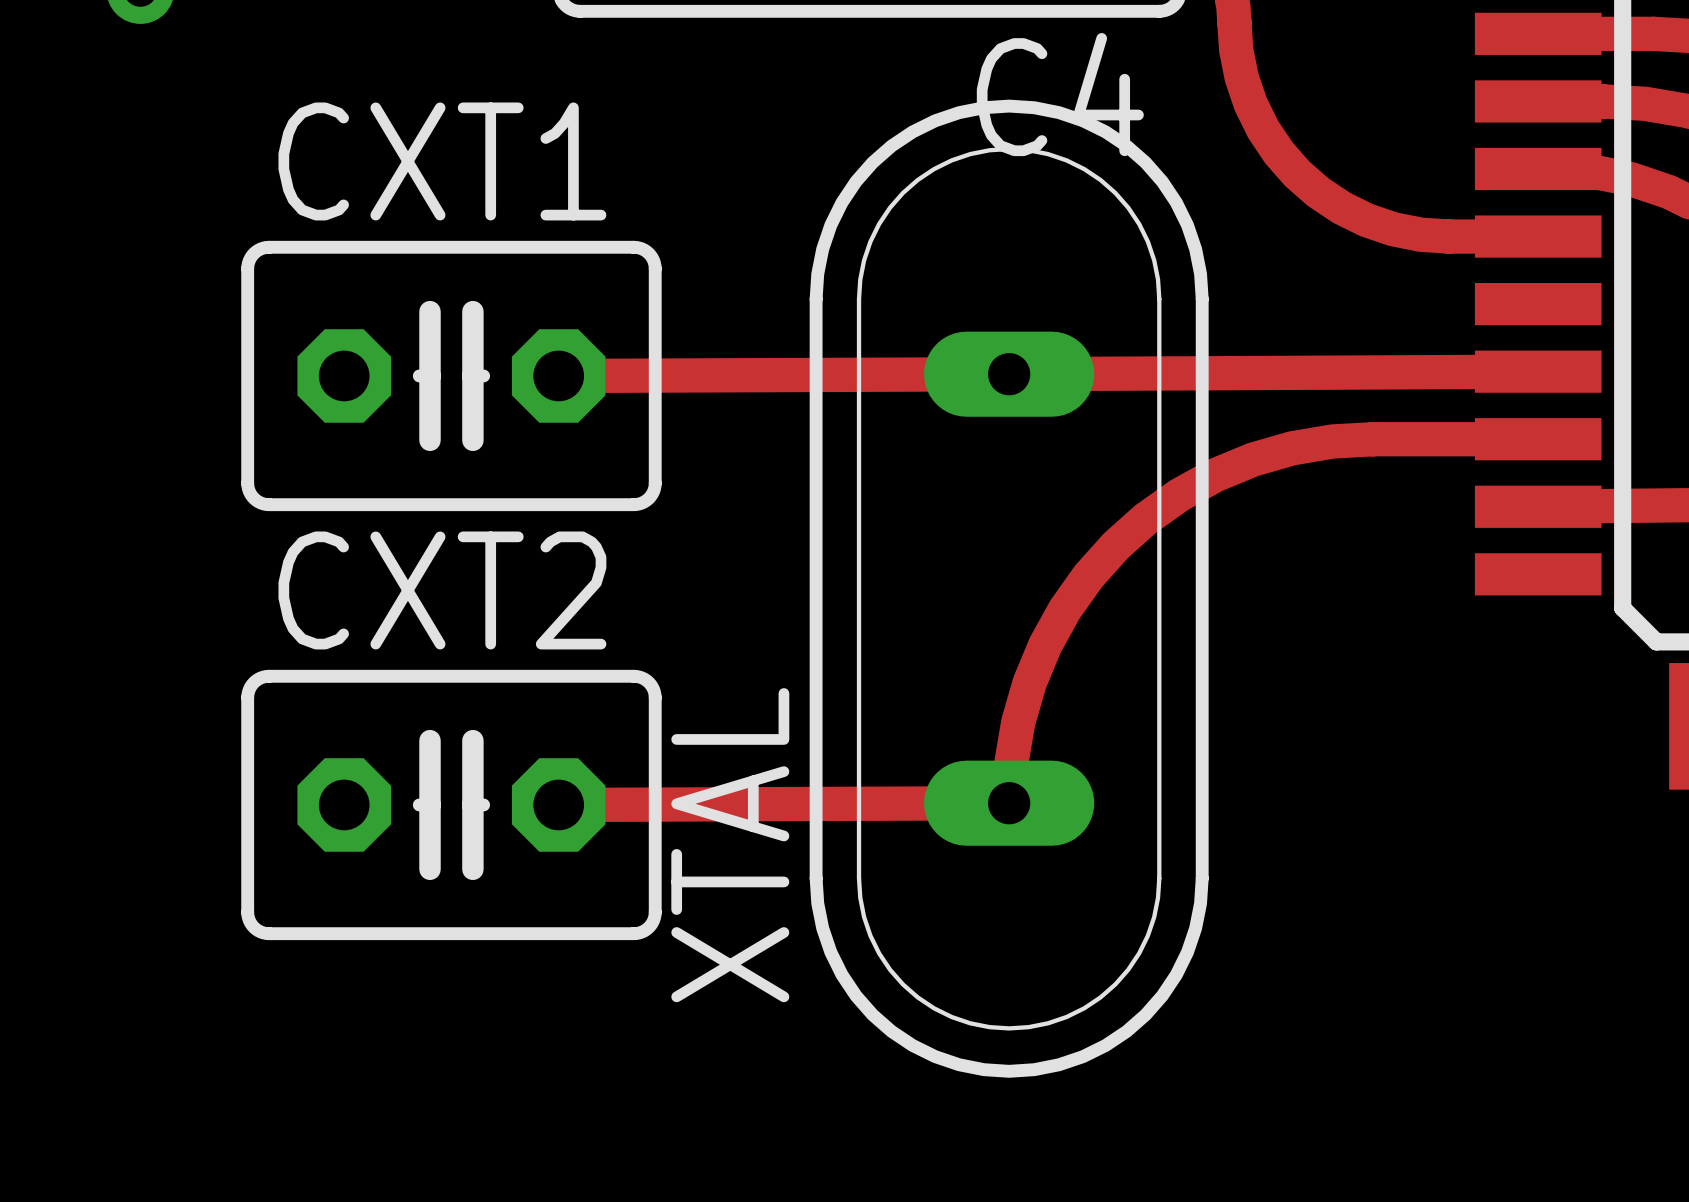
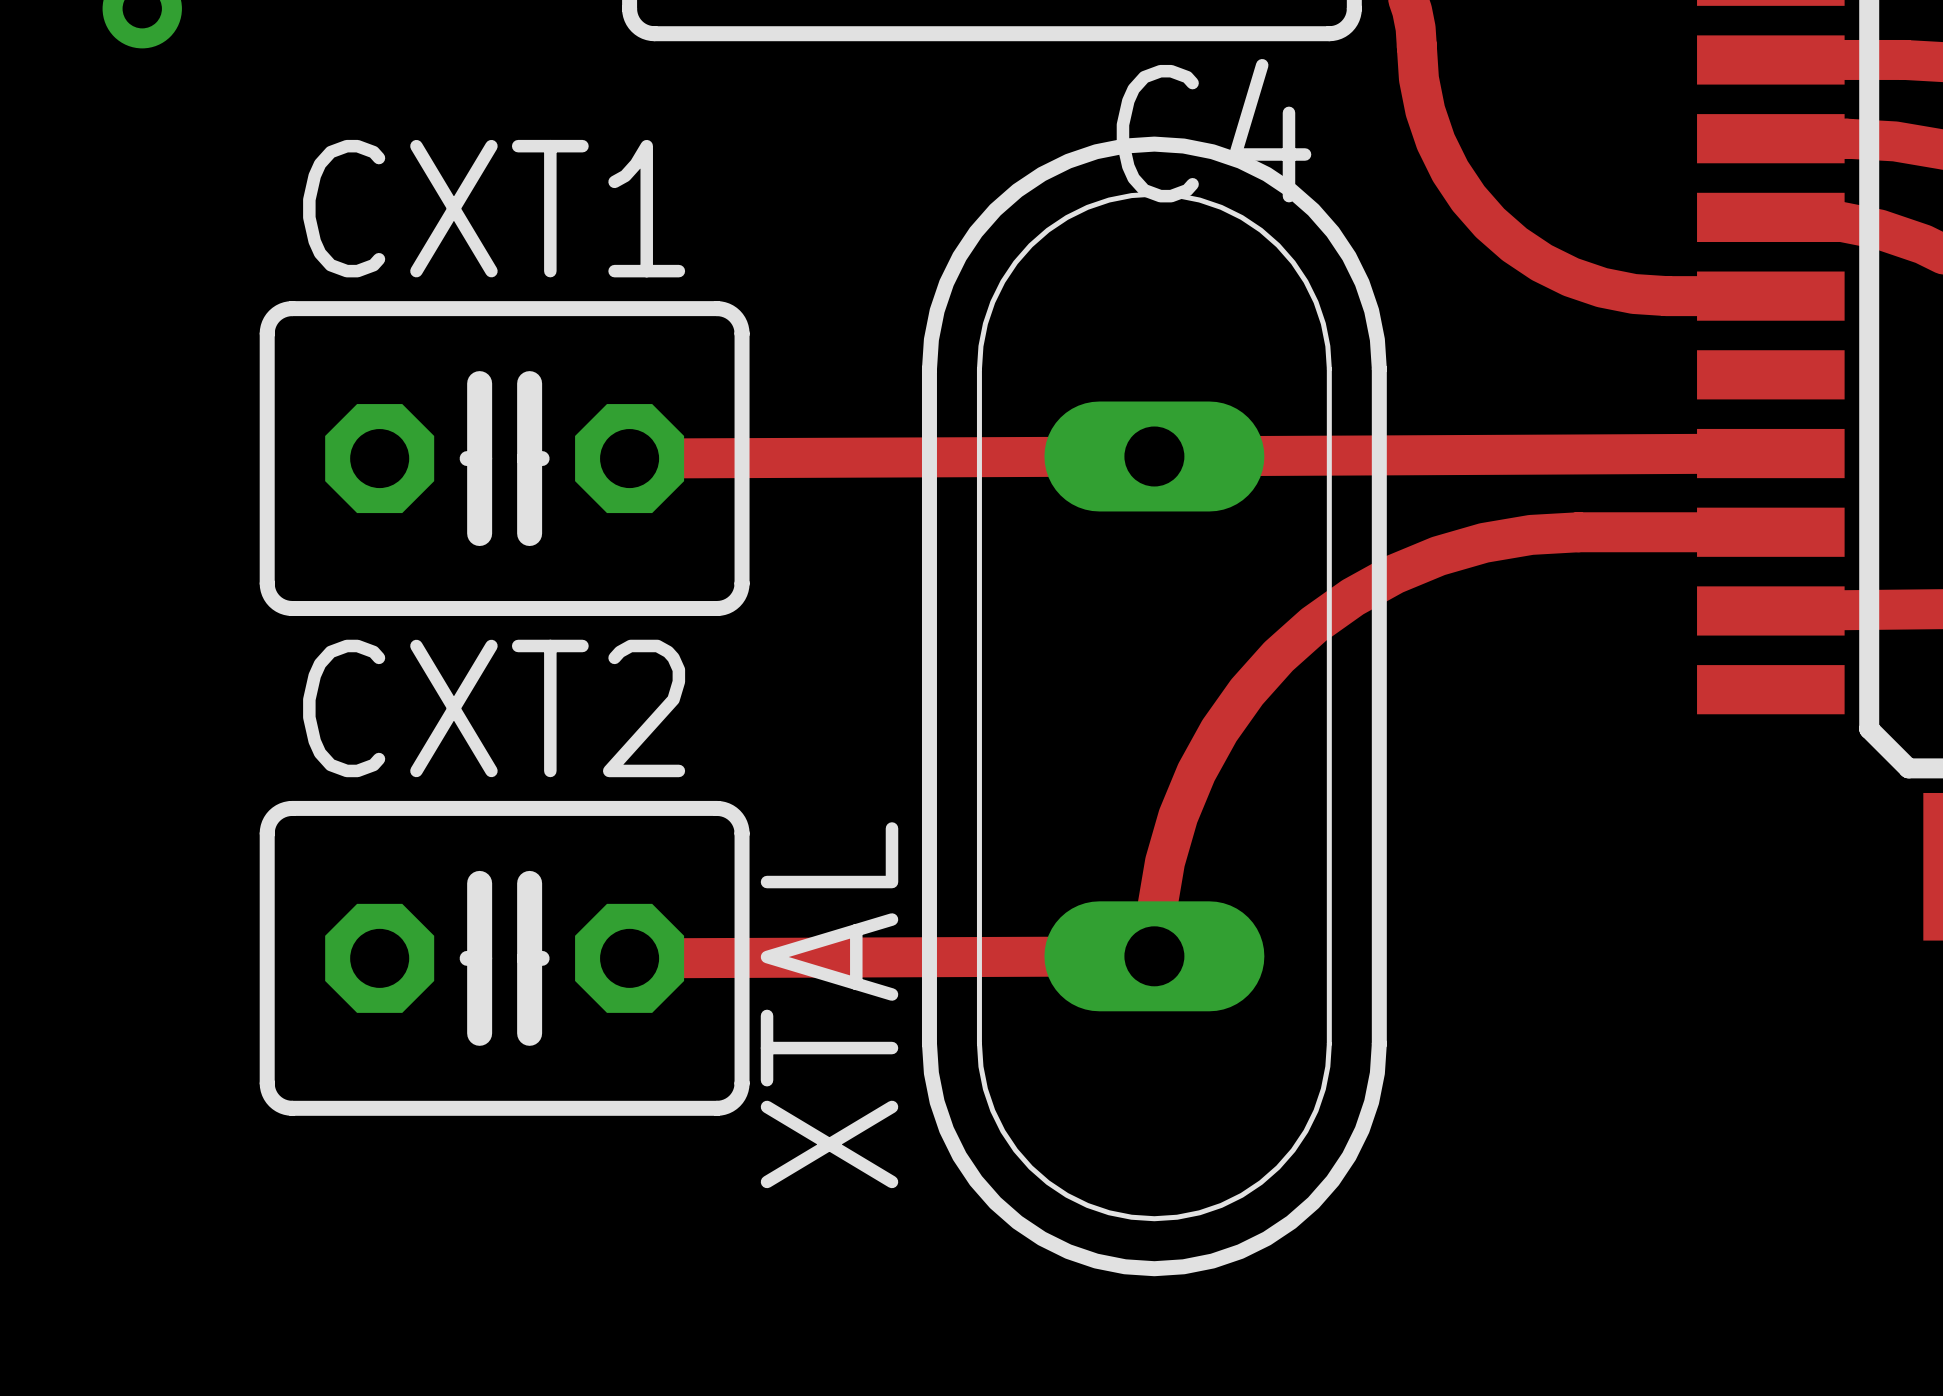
XTAL footprint: [809, 99, 1209, 1078] -> [921, 136, 1387, 1277]

